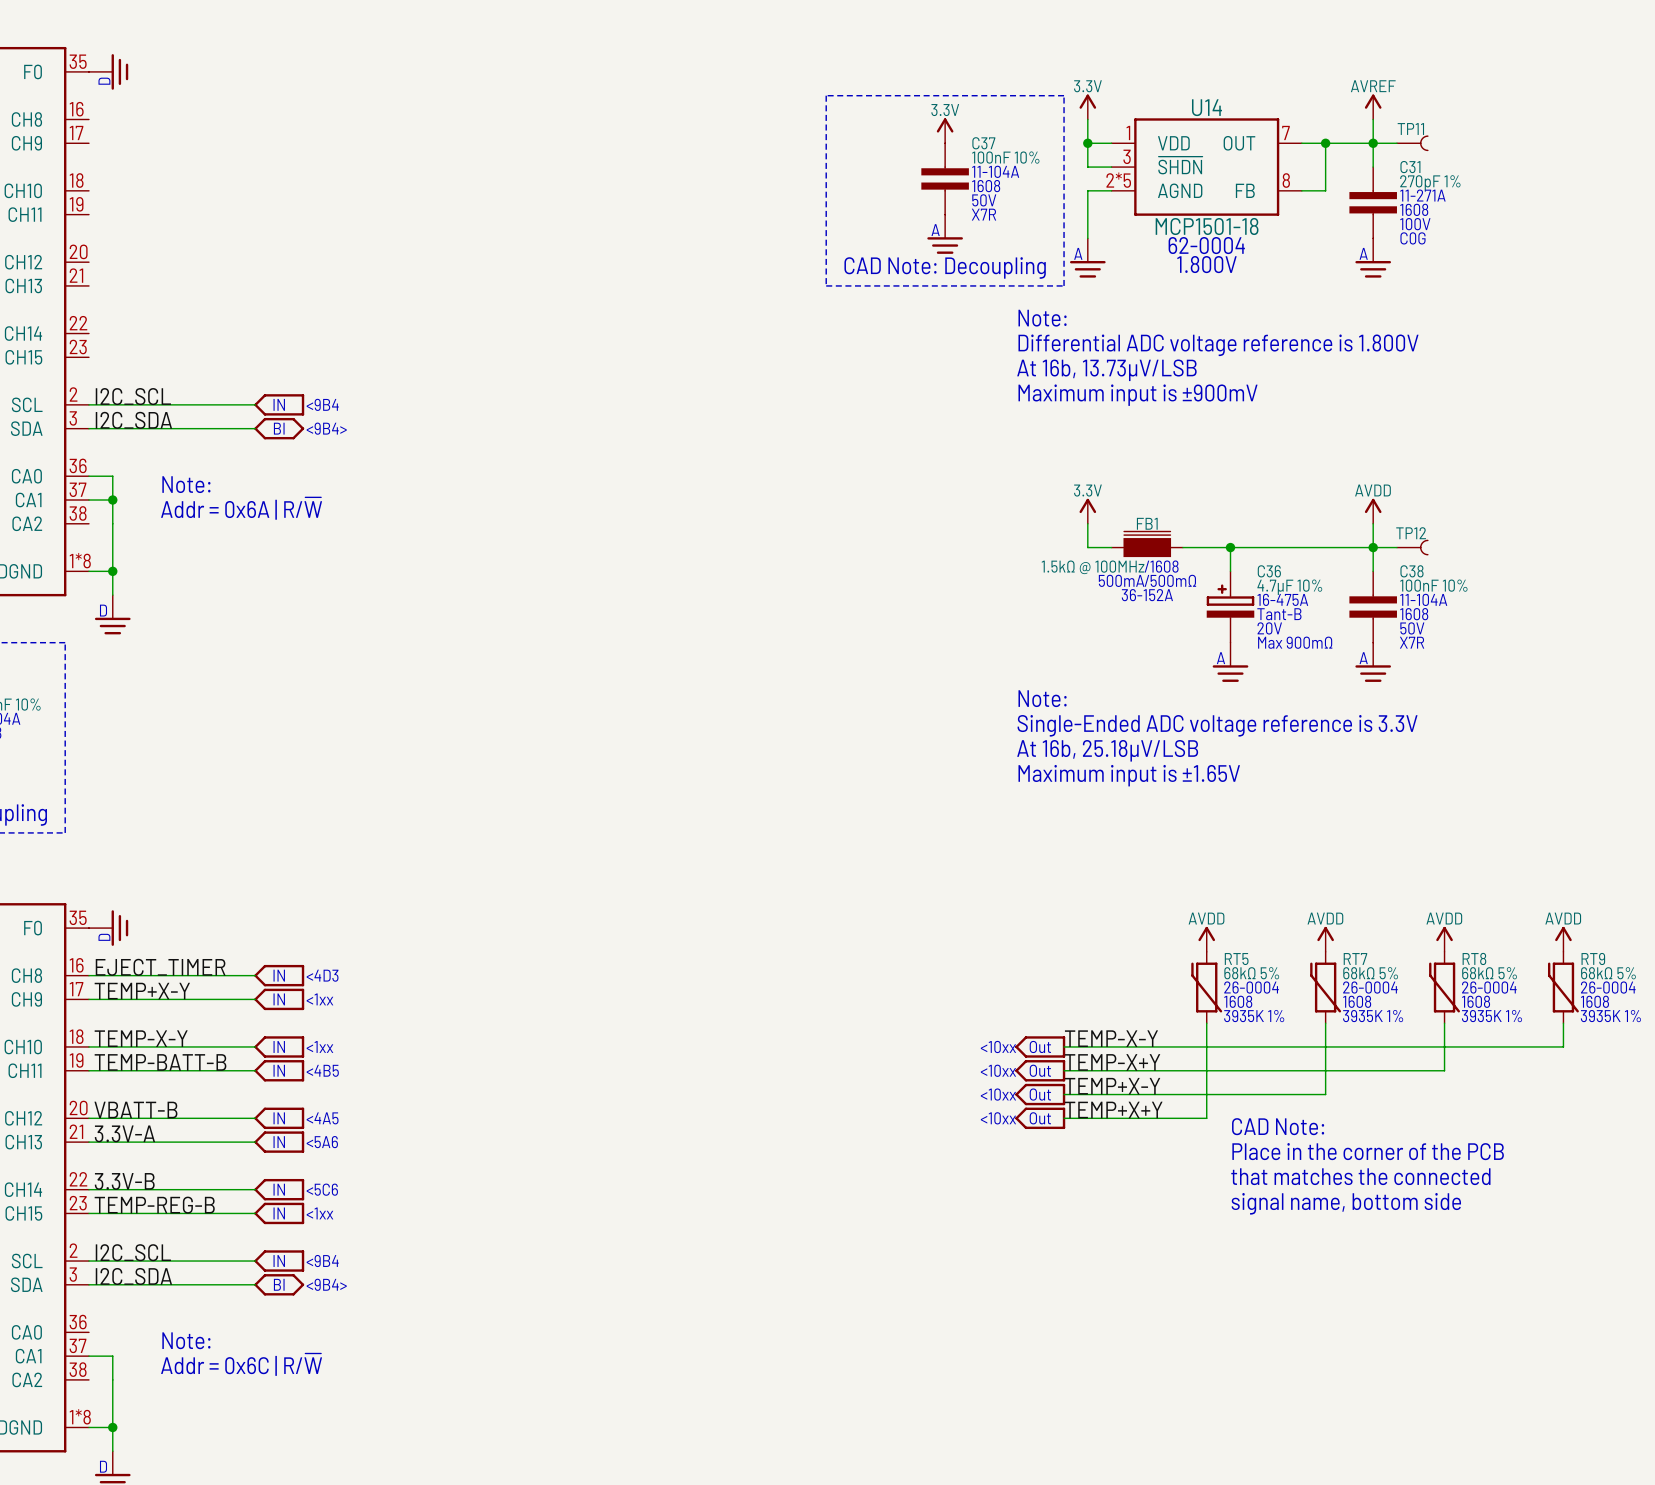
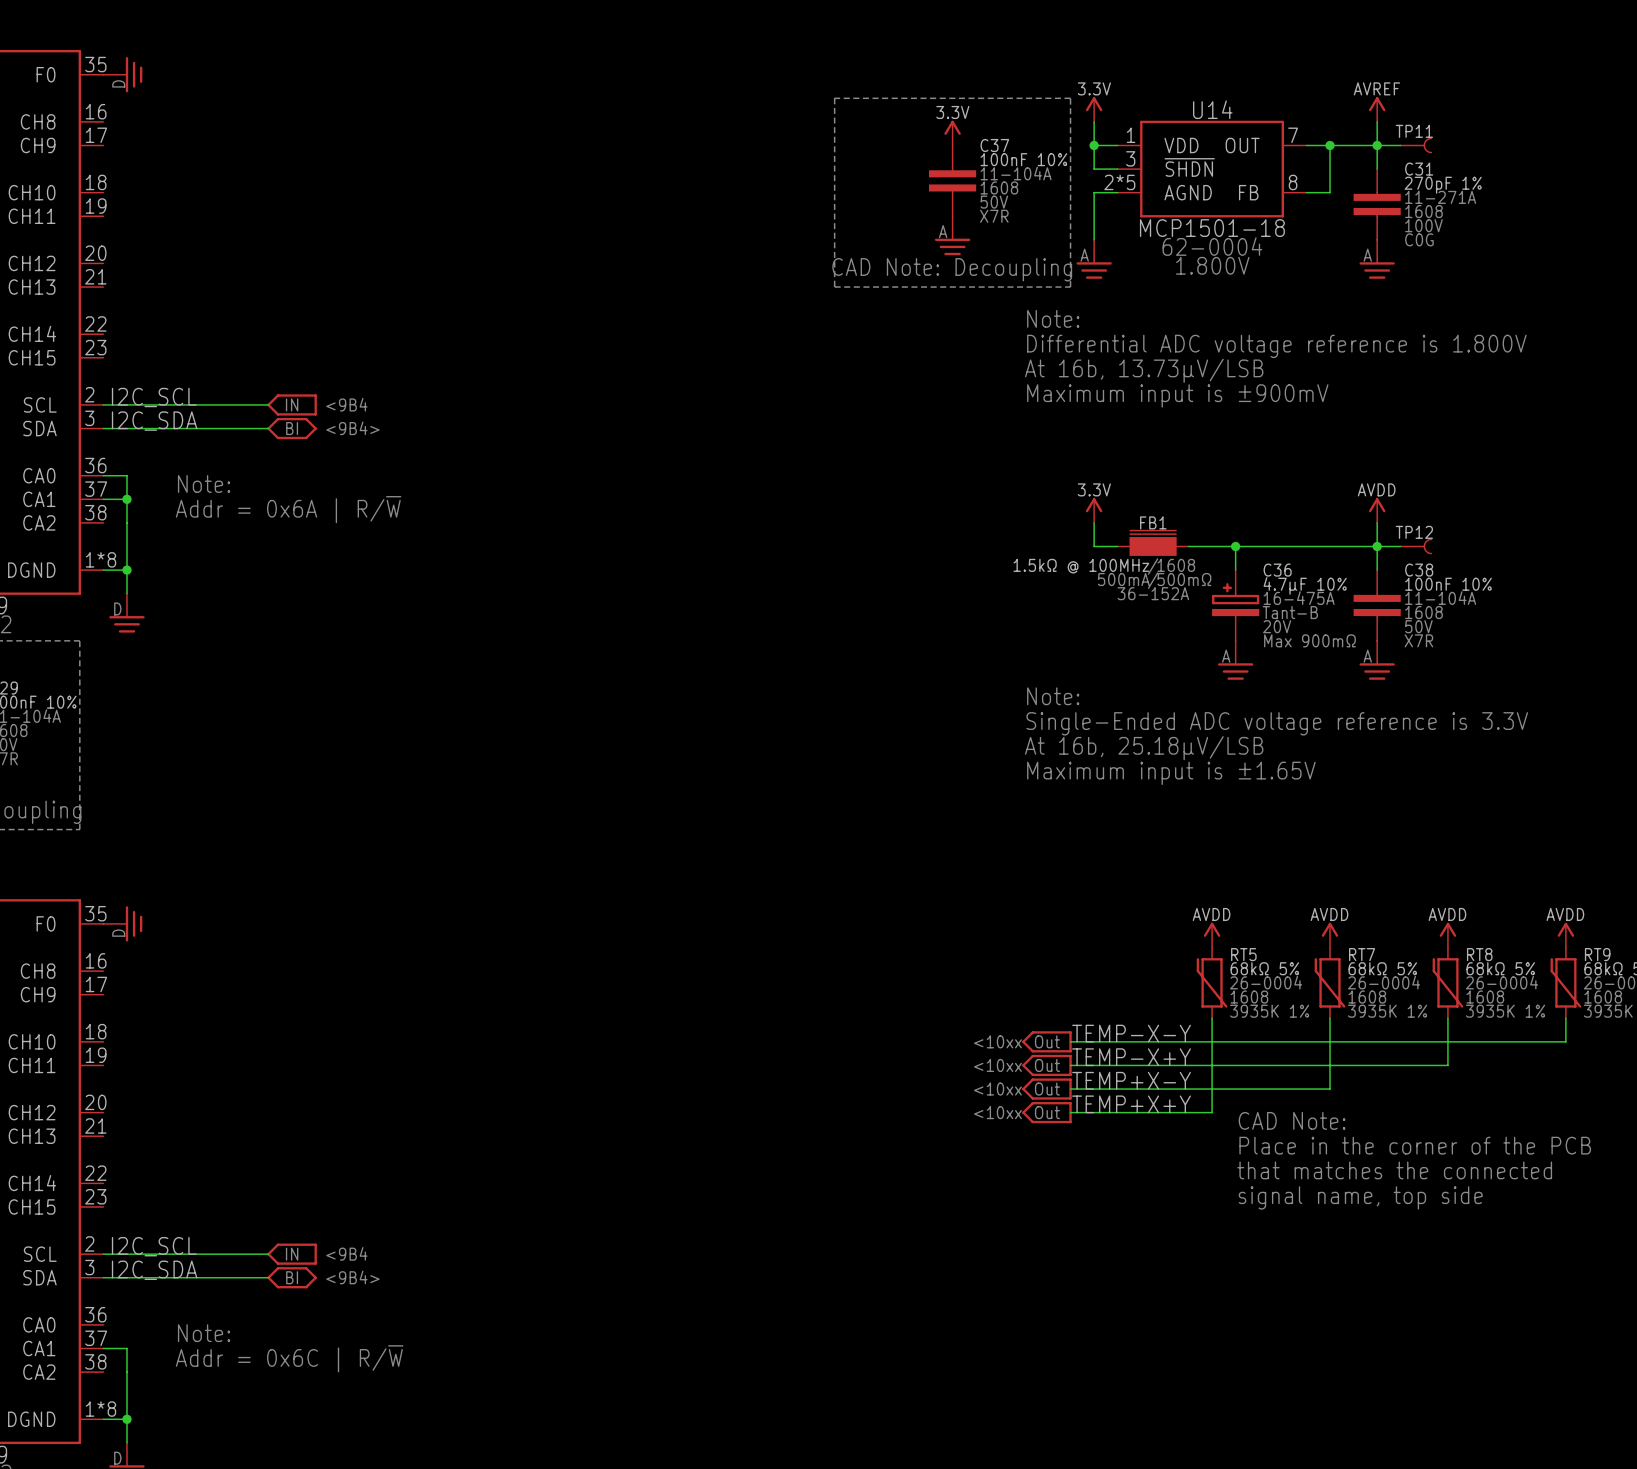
label: EJECT_TIMER (160, 967) -> none
wire: (88, 975) (255, 975) -> none
part: (279, 975) -> none
text: <4D3 (322, 975) -> none
label: TEMP+X-Y (142, 991) -> none
wire: (88, 999) (255, 999) -> none
part: (279, 999) -> none
text: <1xx (319, 999) -> none
label: TEMP-X-Y (141, 1038) -> none
wire: (88, 1046) (255, 1046) -> none
part: (279, 1046) -> none
text: <1xx (319, 1046) -> none
label: TEMP-BATT-B (160, 1062) -> none
wire: (88, 1070) (255, 1070) -> none
part: (279, 1070) -> none
text: <4B5 (322, 1070) -> none
label: VBATT-B (135, 1110) -> none
wire: (88, 1118) (255, 1118) -> none
part: (279, 1118) -> none
text: <4A5 (322, 1118) -> none
label: 3.3V-A (124, 1133) -> none
wire: (88, 1142) (255, 1142) -> none
part: (279, 1142) -> none
text: <5A6 (322, 1142) -> none
label: 3.3V-B (124, 1181) -> none
wire: (88, 1189) (255, 1189) -> none
part: (279, 1189) -> none
text: <5C6 (322, 1189) -> none
text: signal name, bottom side (1346, 1203) -> signal name, top side (1360, 1197)
label: TEMP-REG-B (154, 1205) -> none
wire: (88, 1213) (255, 1213) -> none
part: (279, 1213) -> none
text: <1xx (319, 1213) -> none

